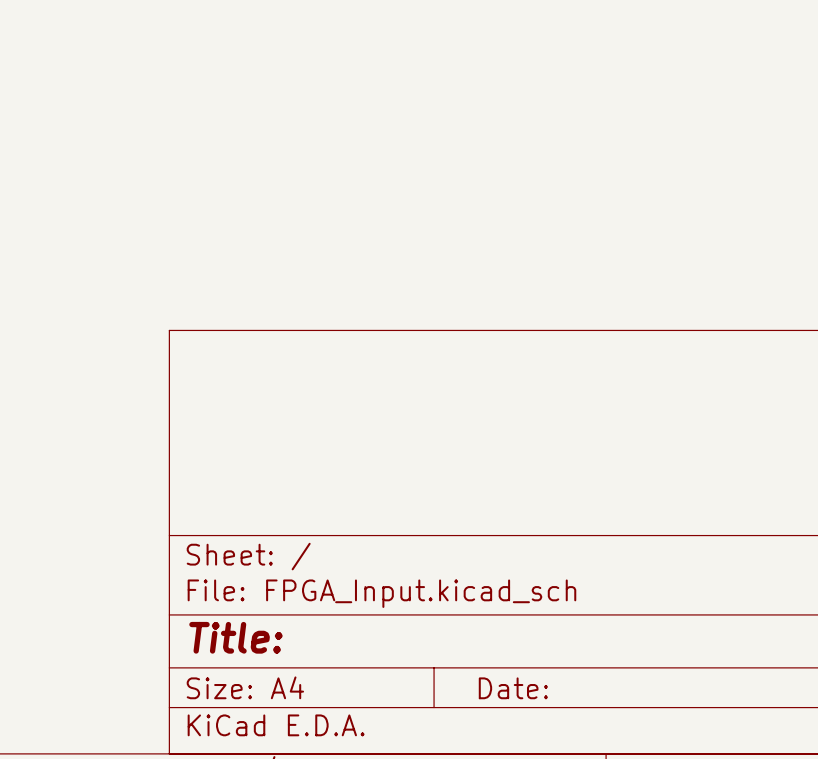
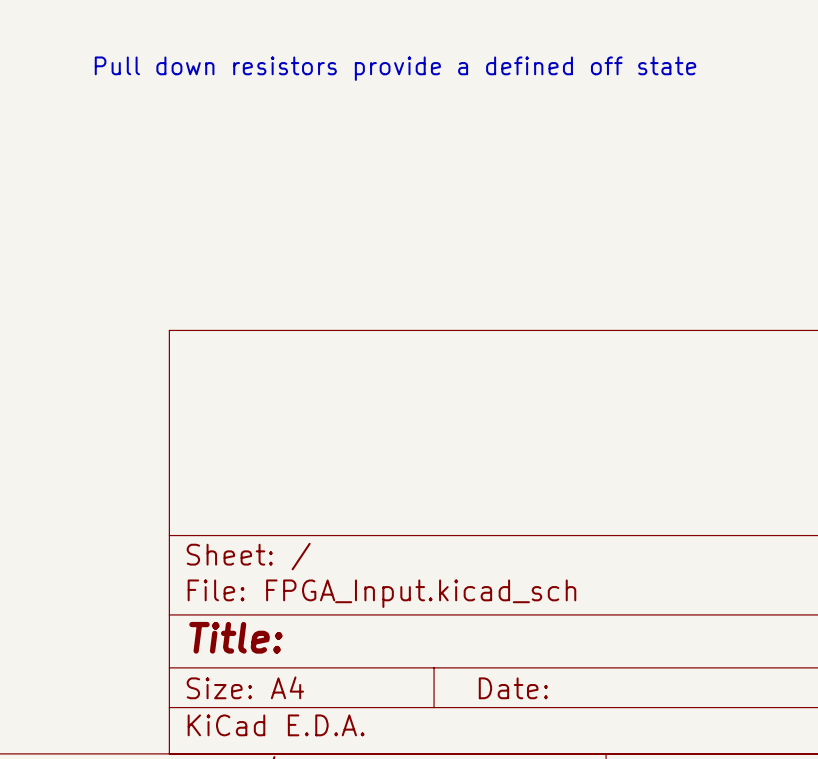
text: none -> Pull down resistors provide a defined off state (395, 68)

